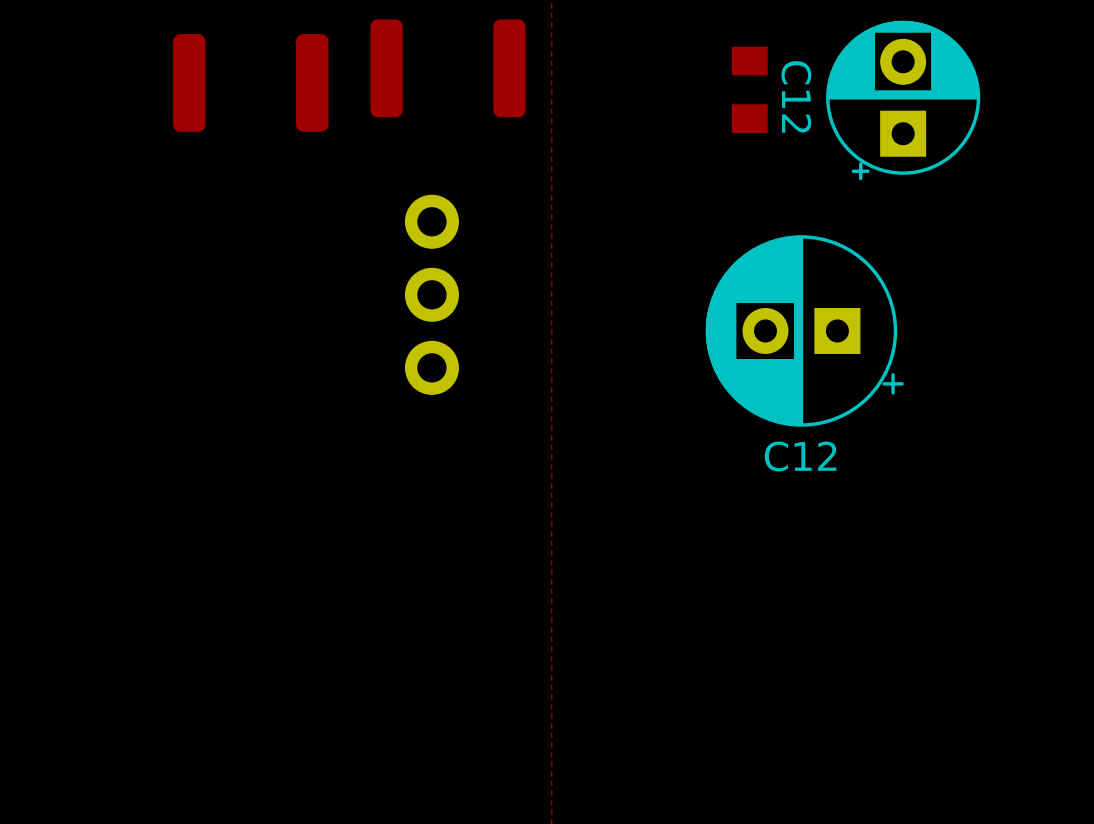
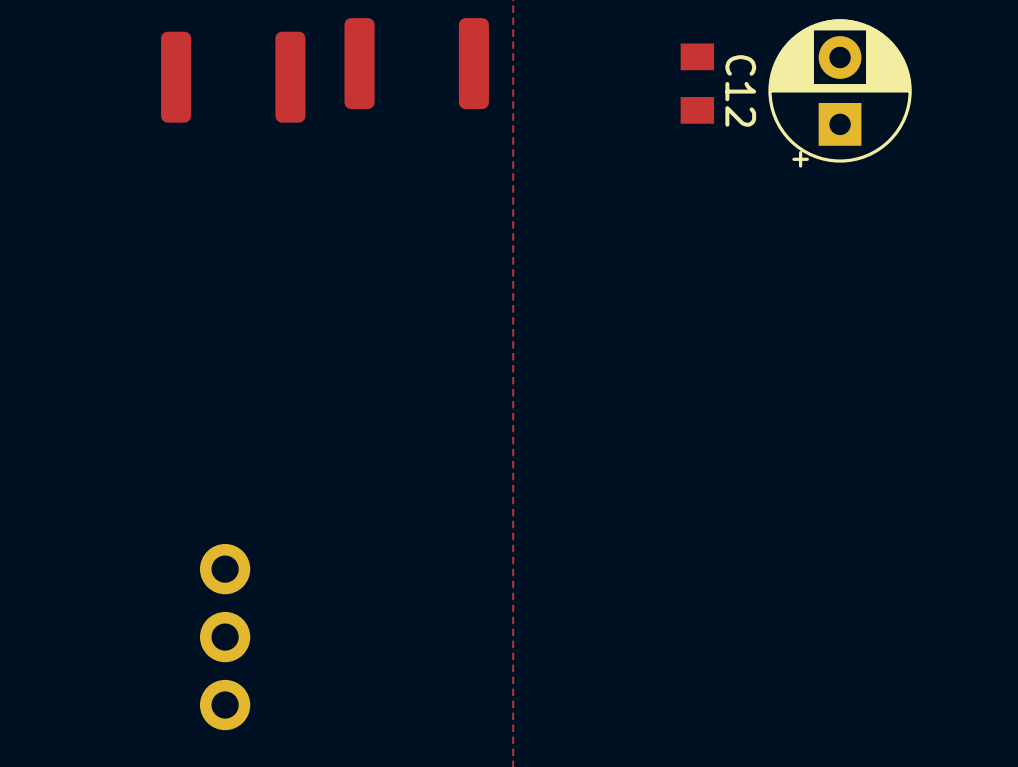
part position: (431, 294) -> (225, 637)
C12: (804, 330) -> none

